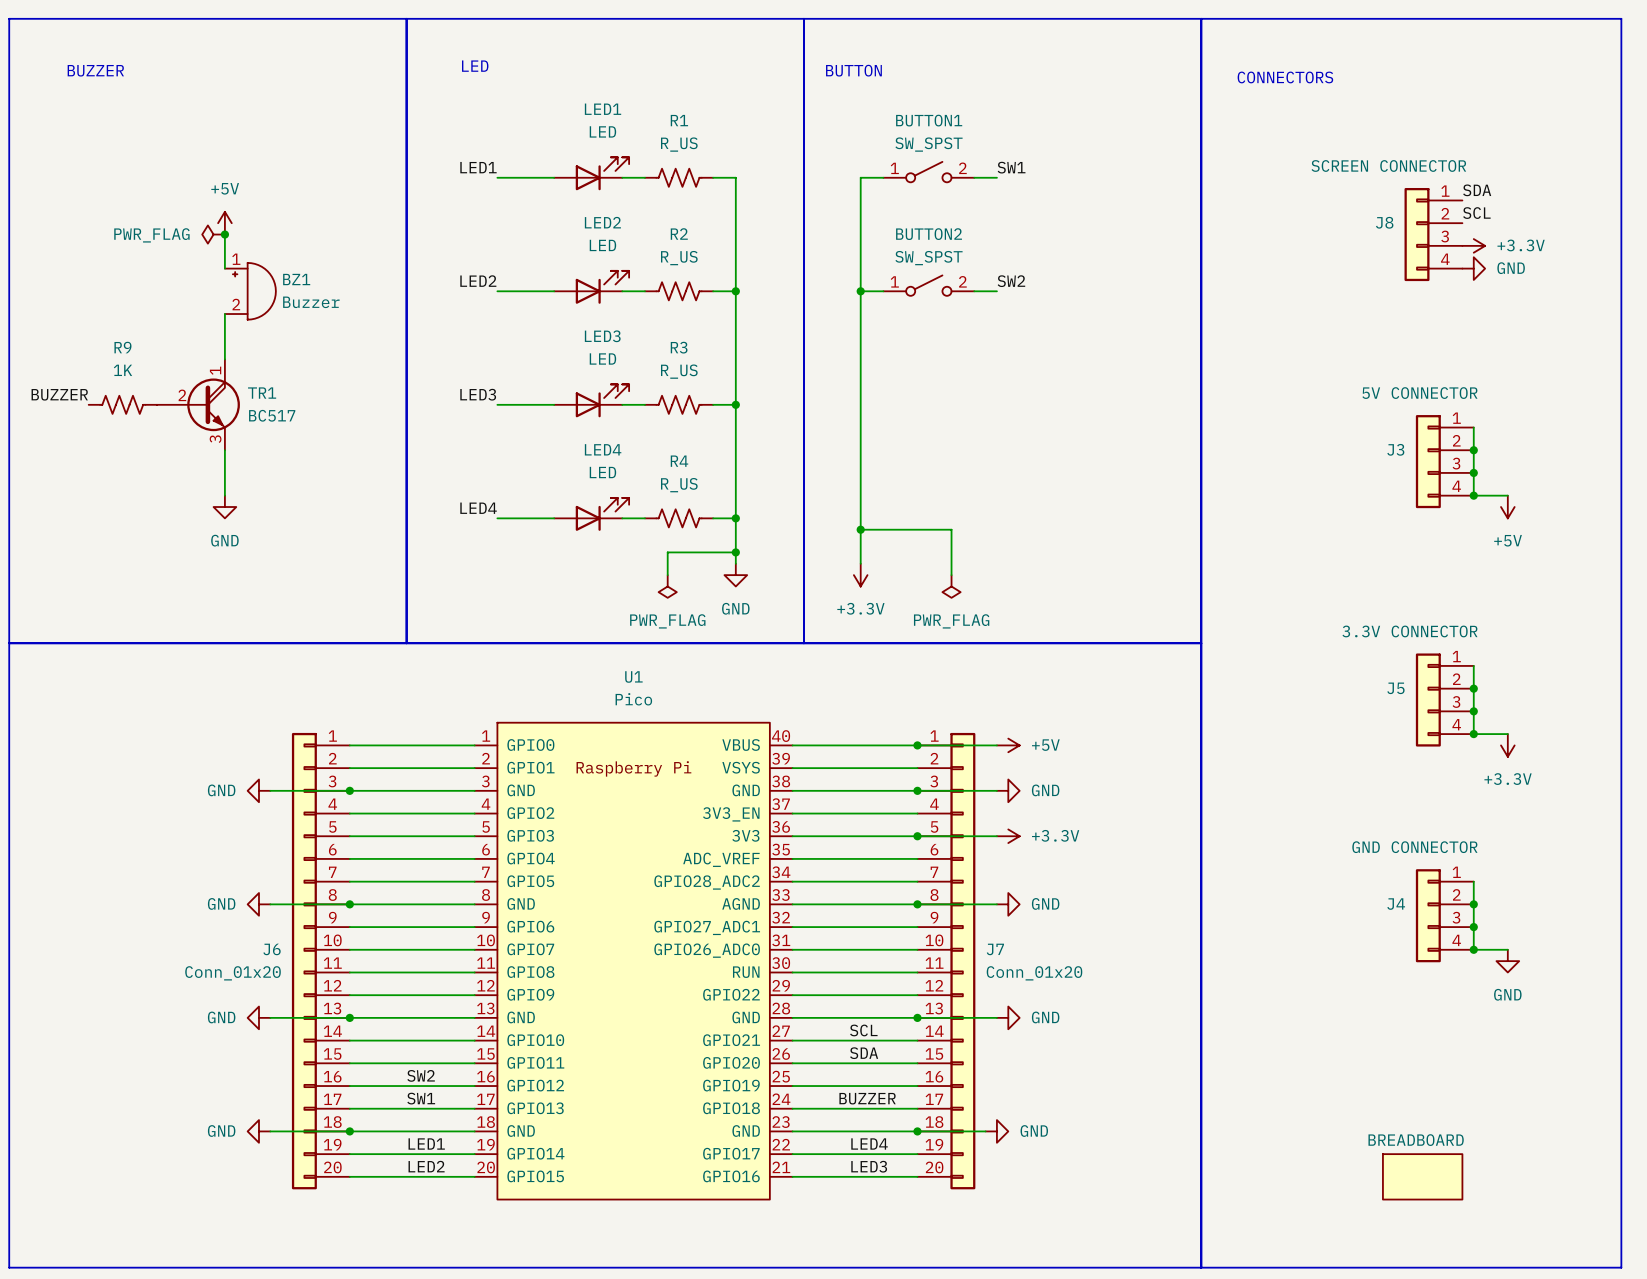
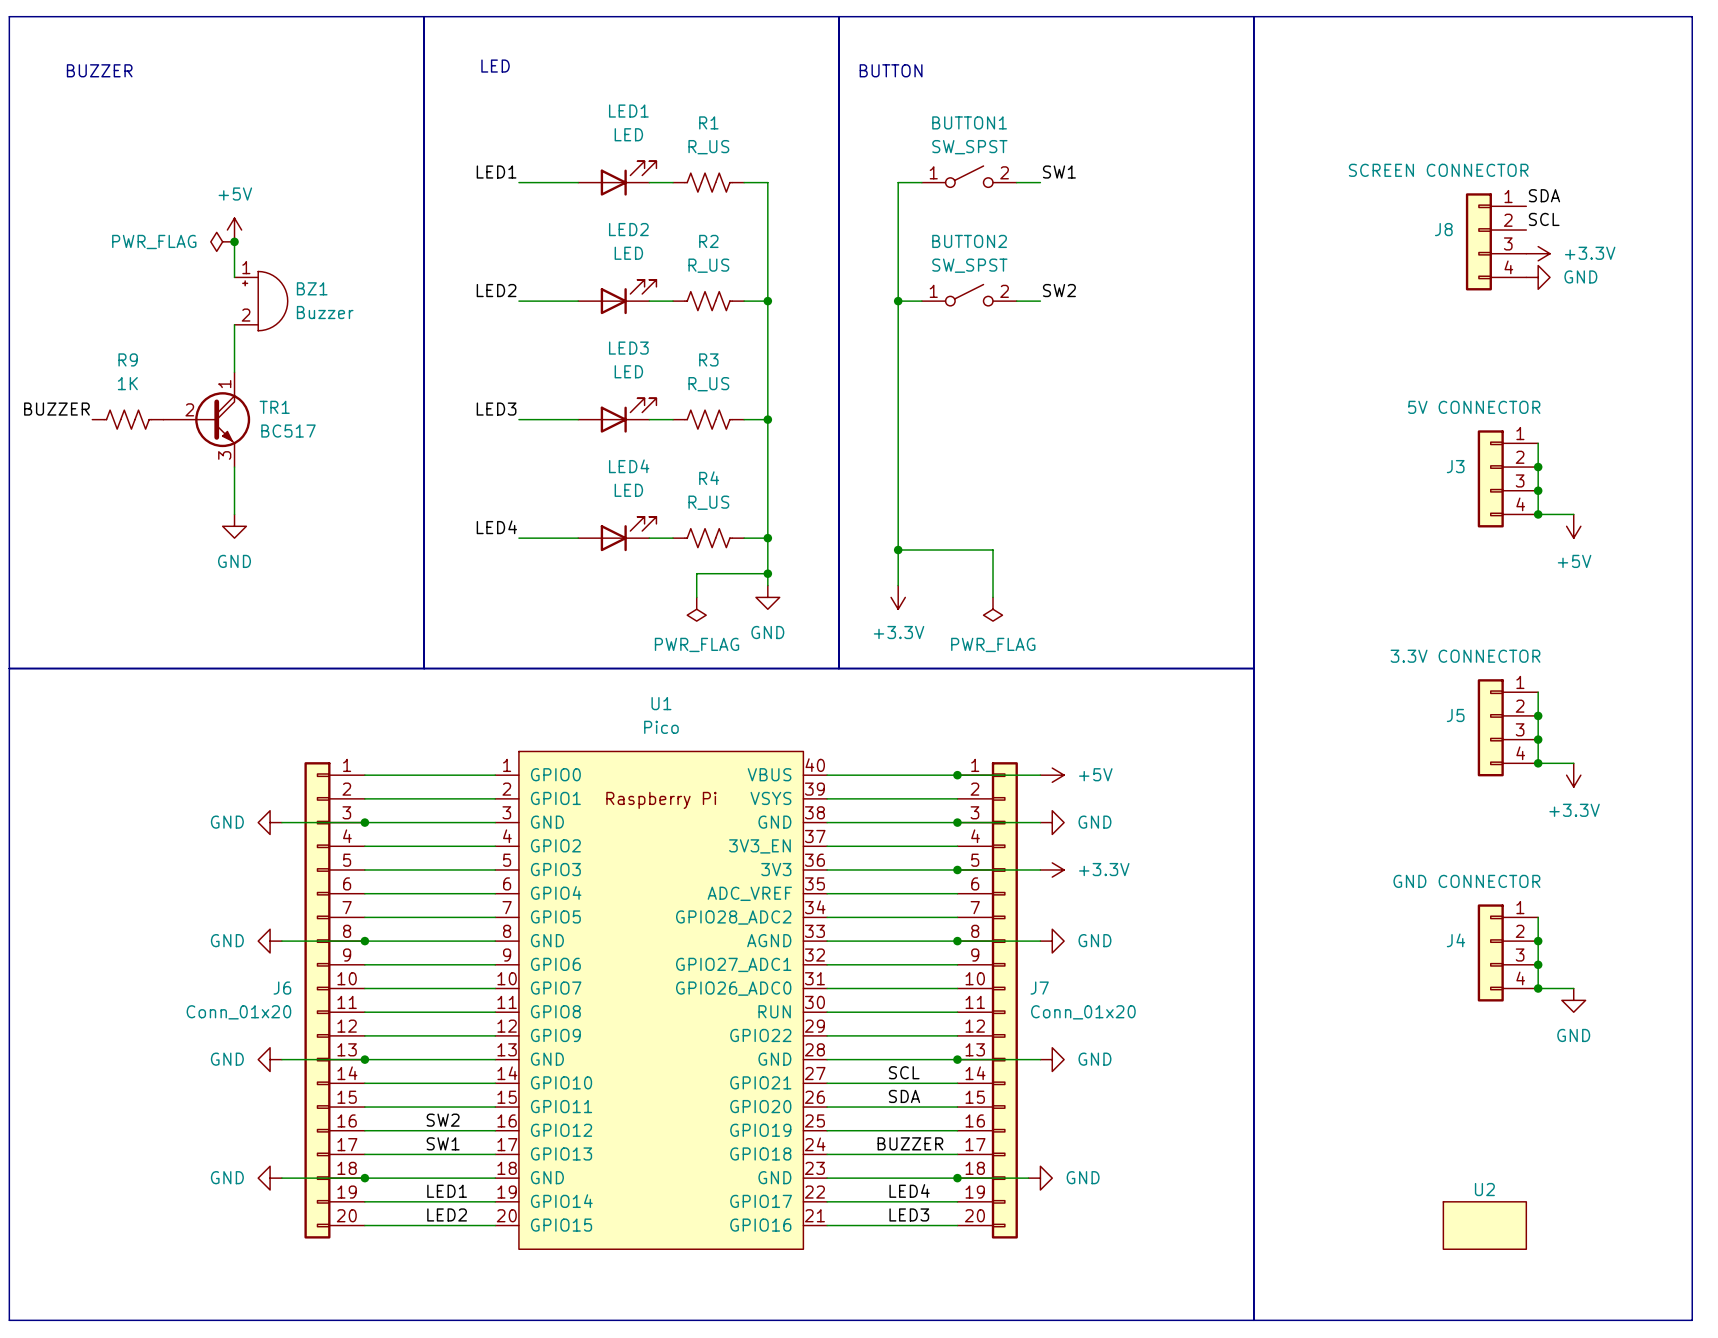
text: CONNECTORS (1285, 77) -> none
BREADBOARD name: BREADBOARD (1416, 1140) -> U2 (1484, 1189)

